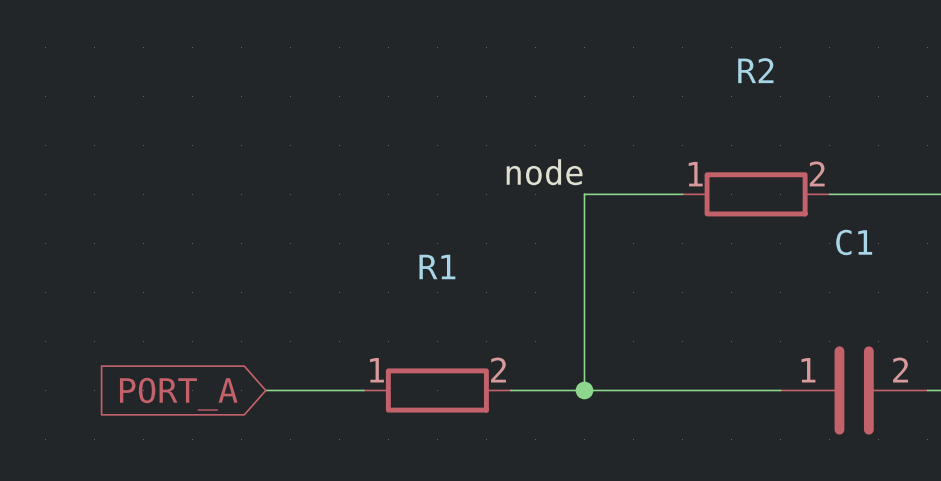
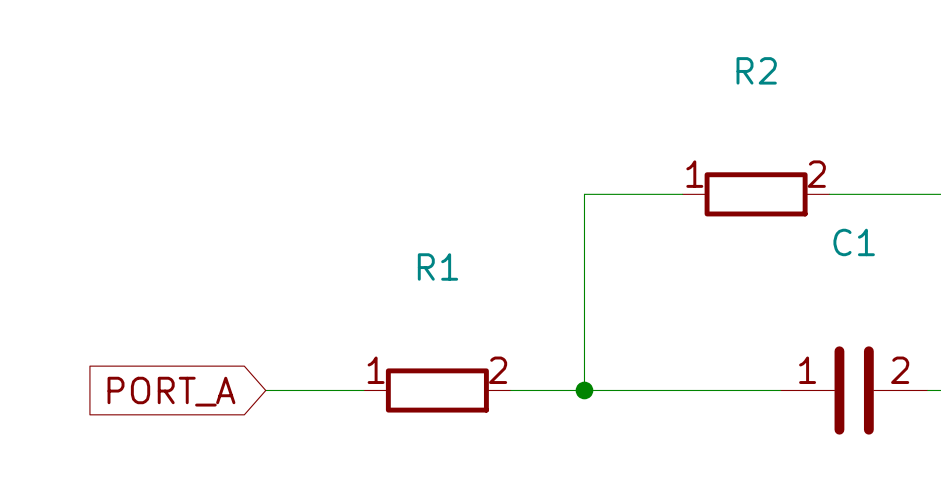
label: node (544, 172) -> none

